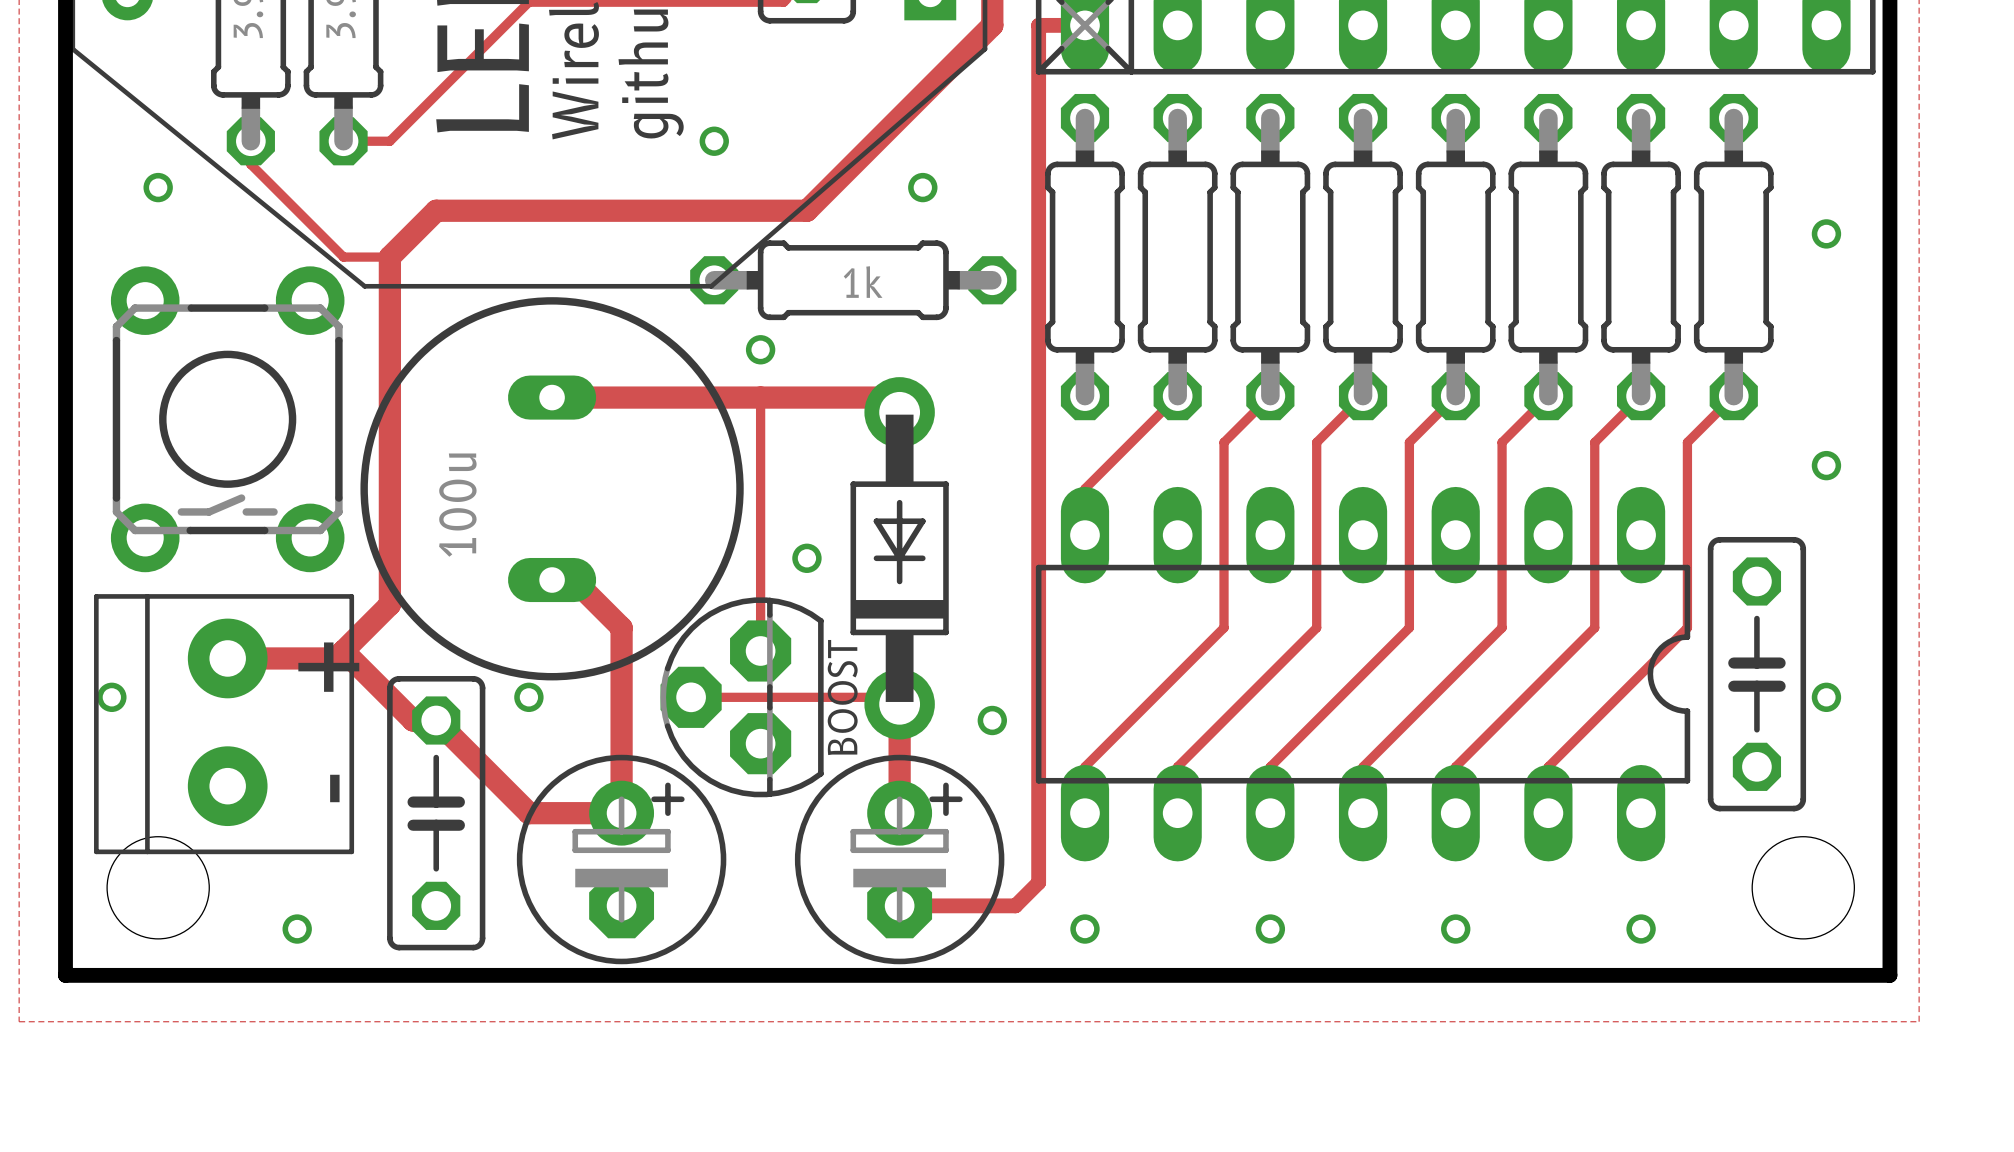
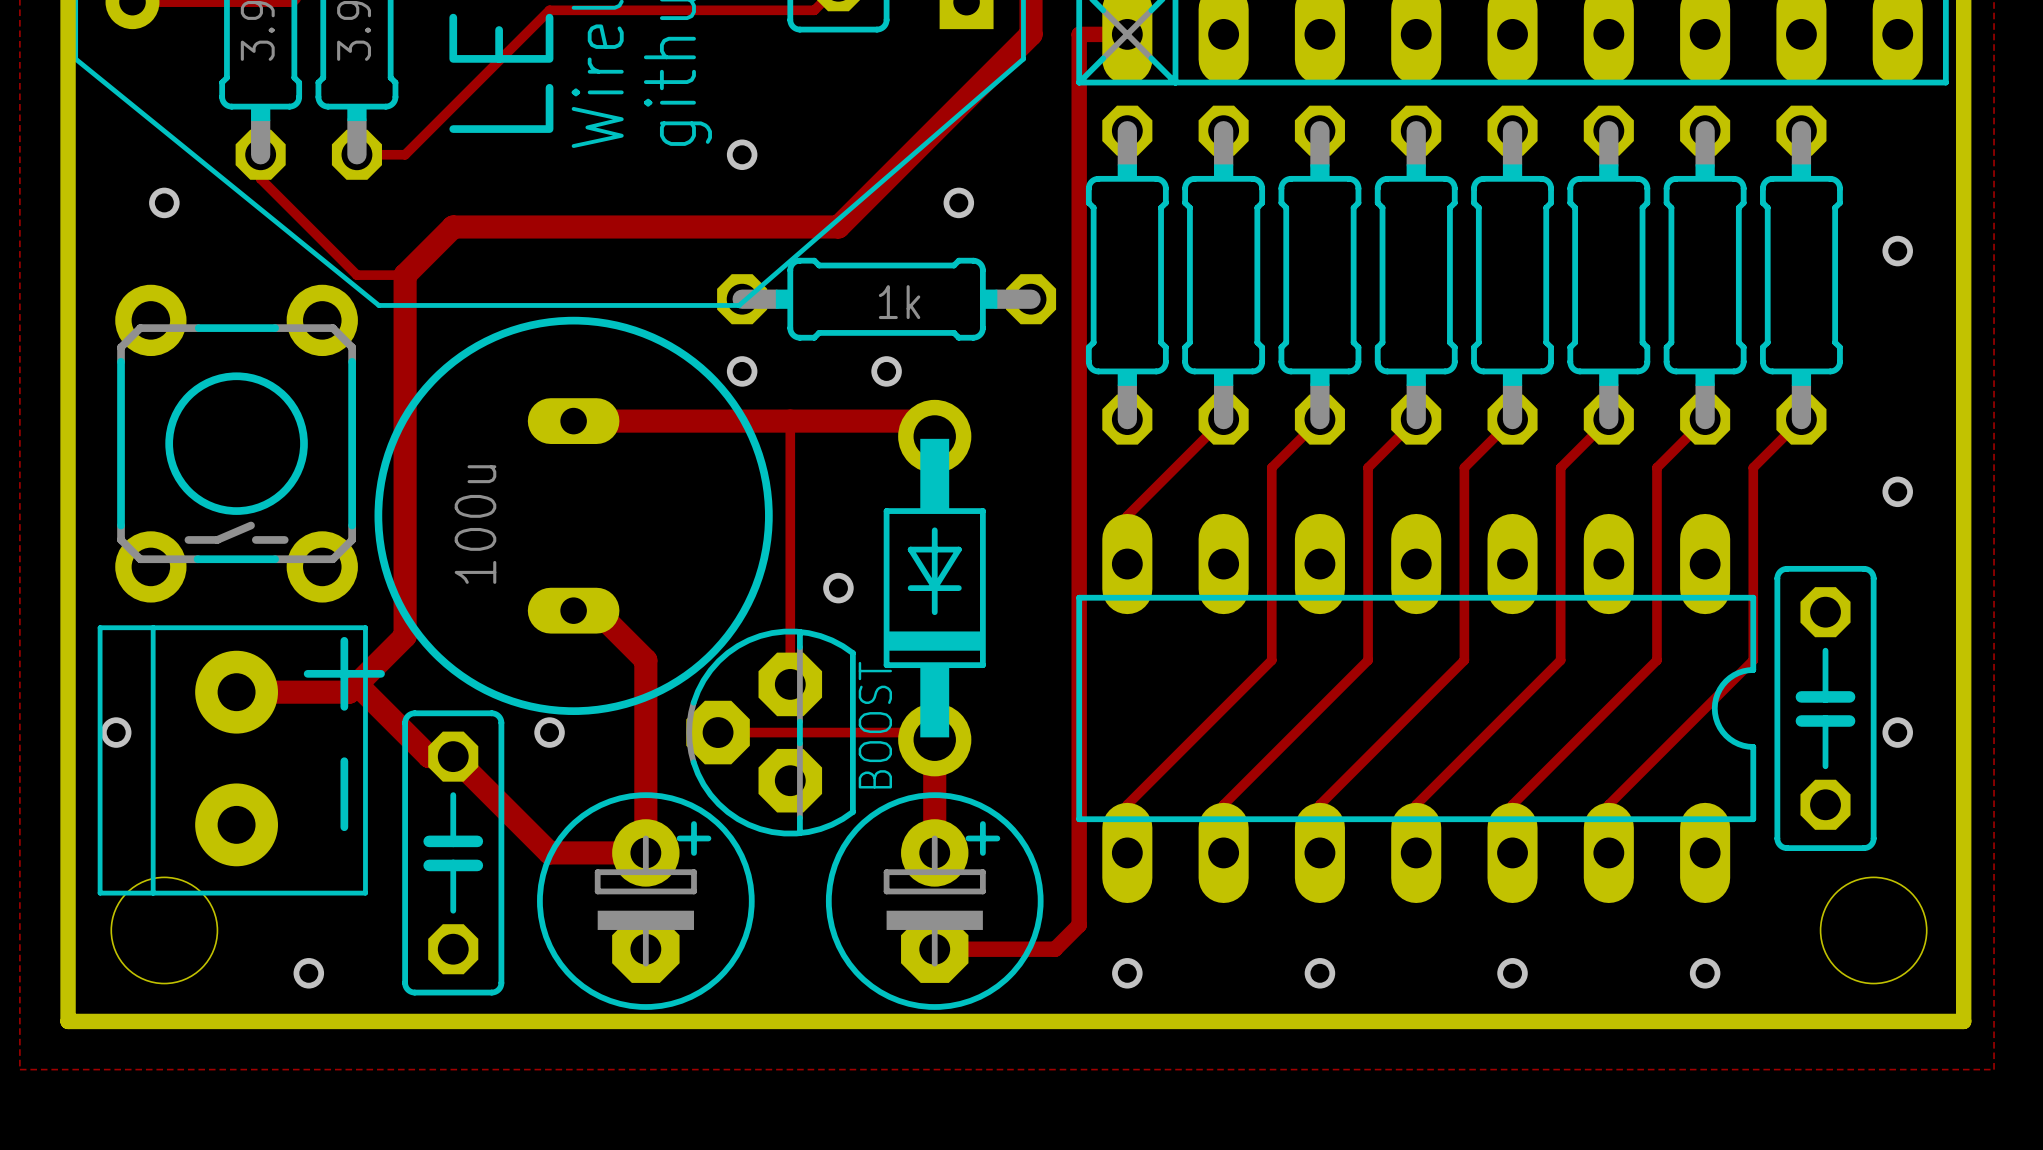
via: none -> (742, 371)
via: (760, 349) -> none
via: none -> (886, 371)
via: (992, 720) -> none

